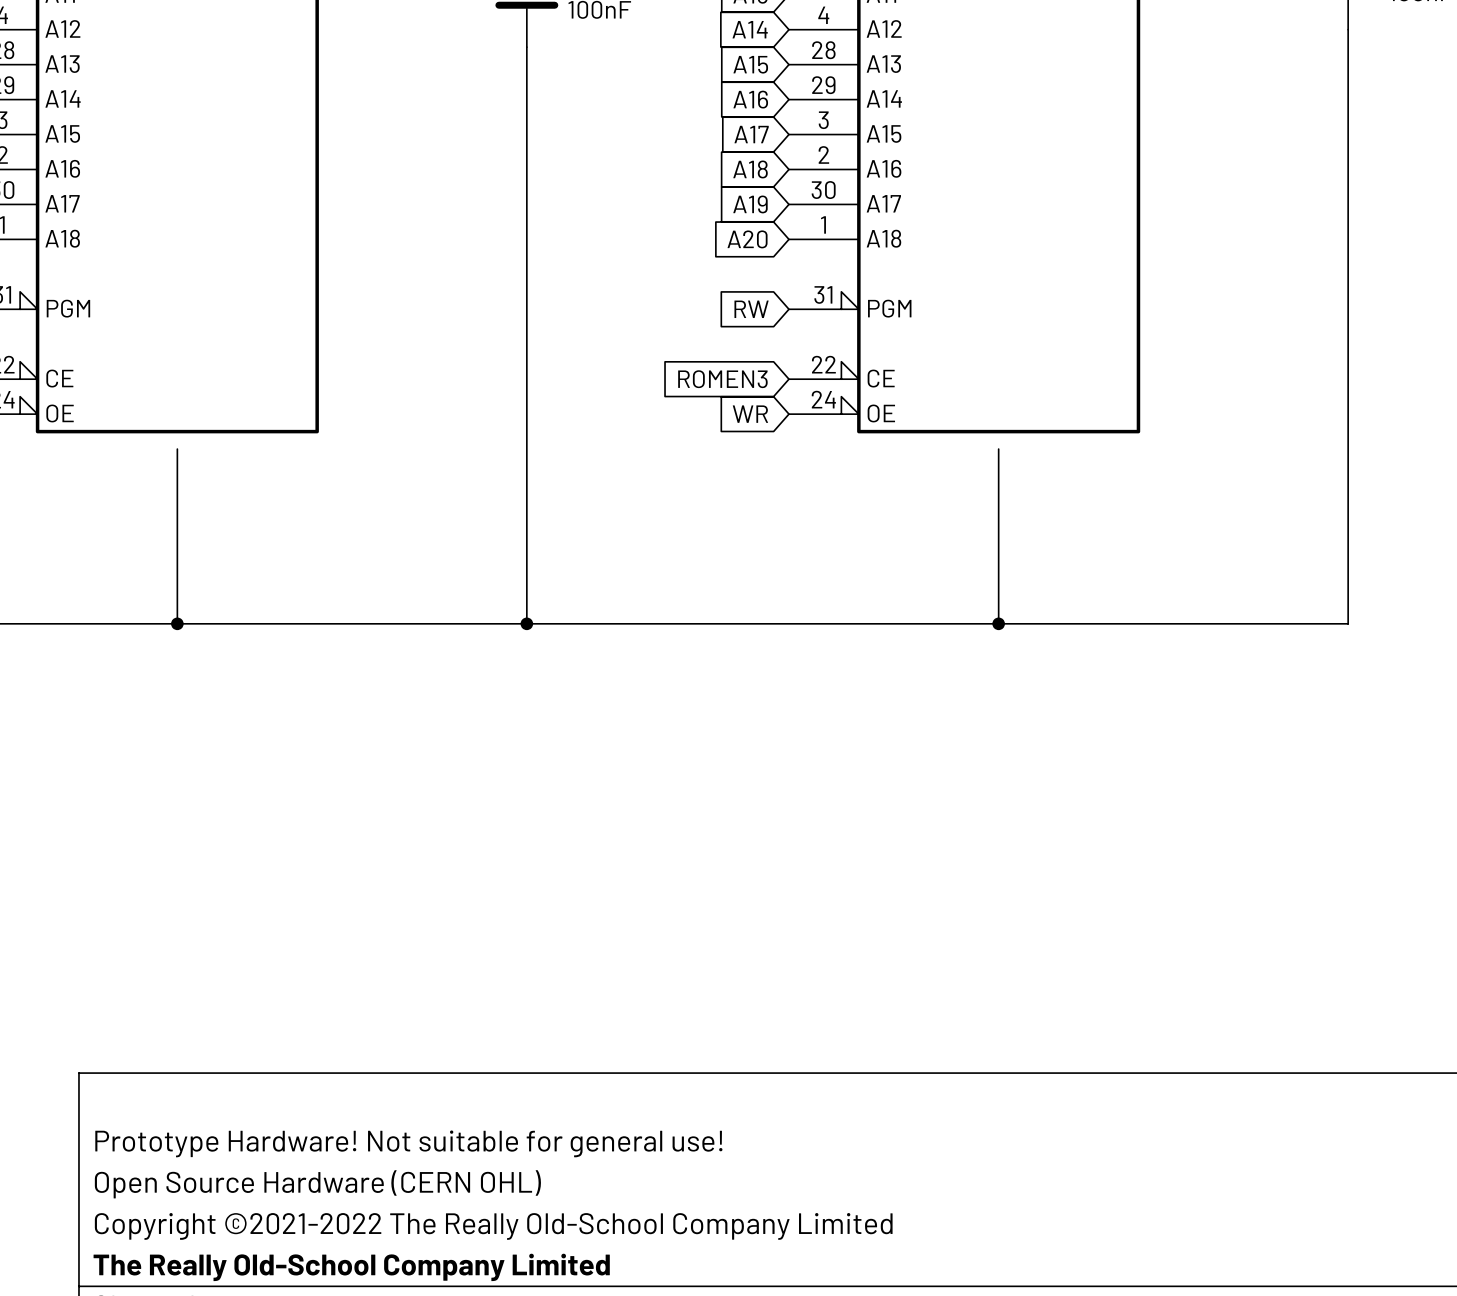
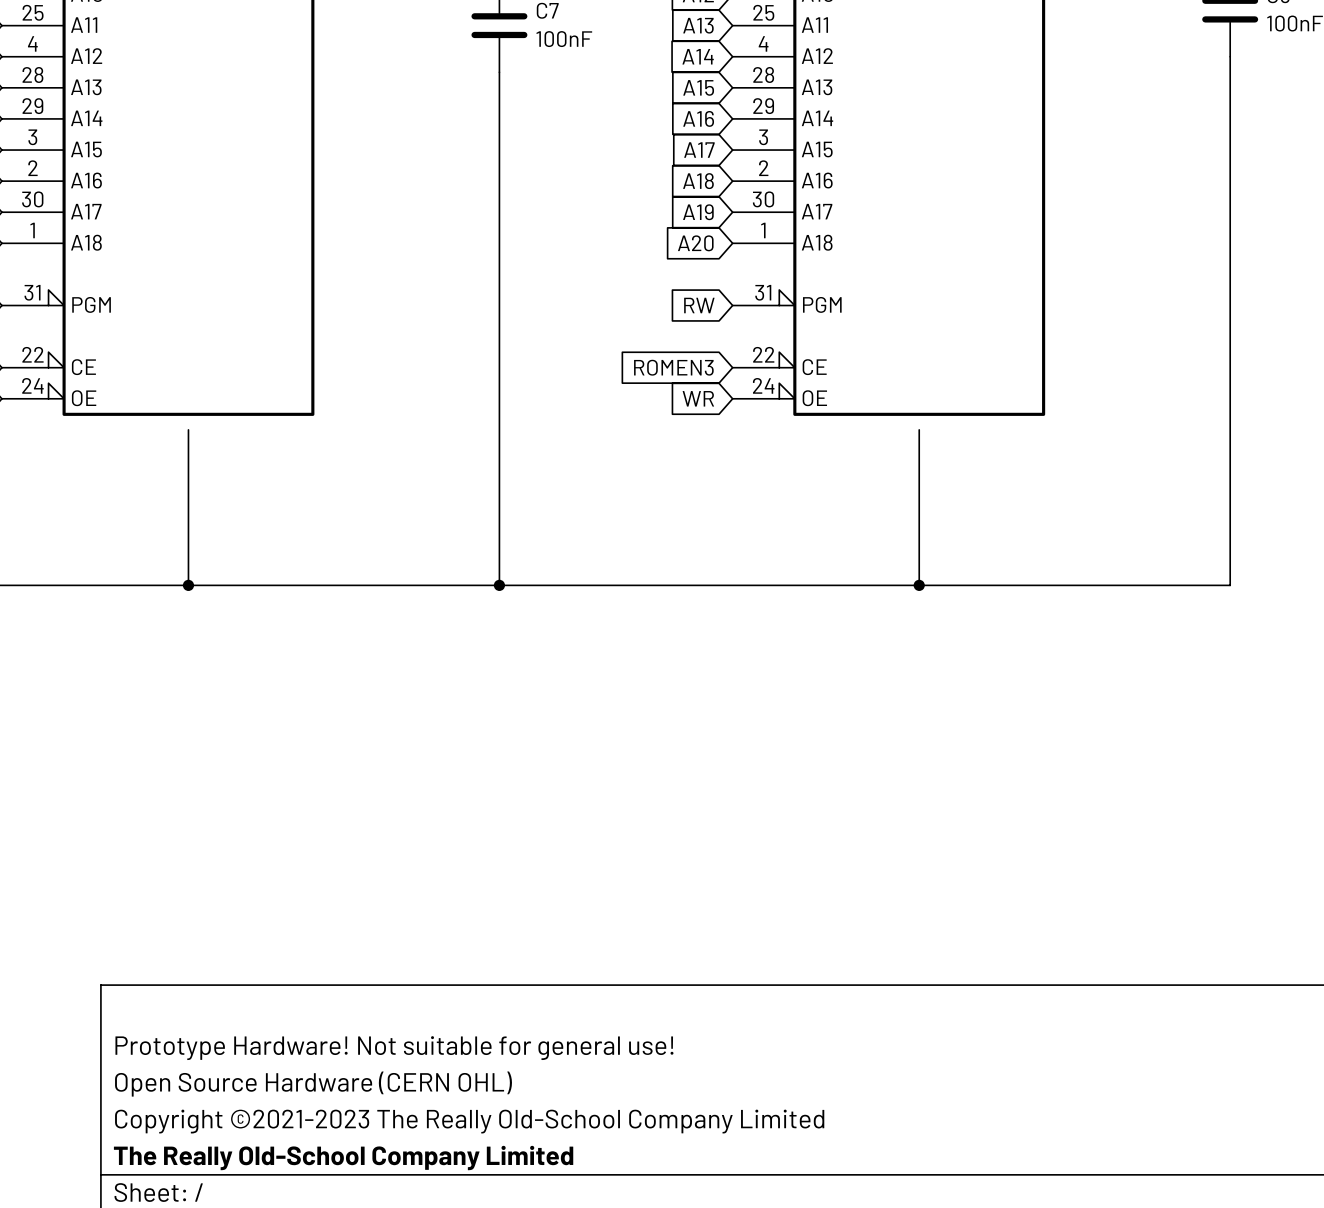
title block: Copyright ©2021-2022 The Really Old-School Company Limited (493, 1226) -> Copyright ©2021-2023 The Really Old-School Company Limited (469, 1121)

